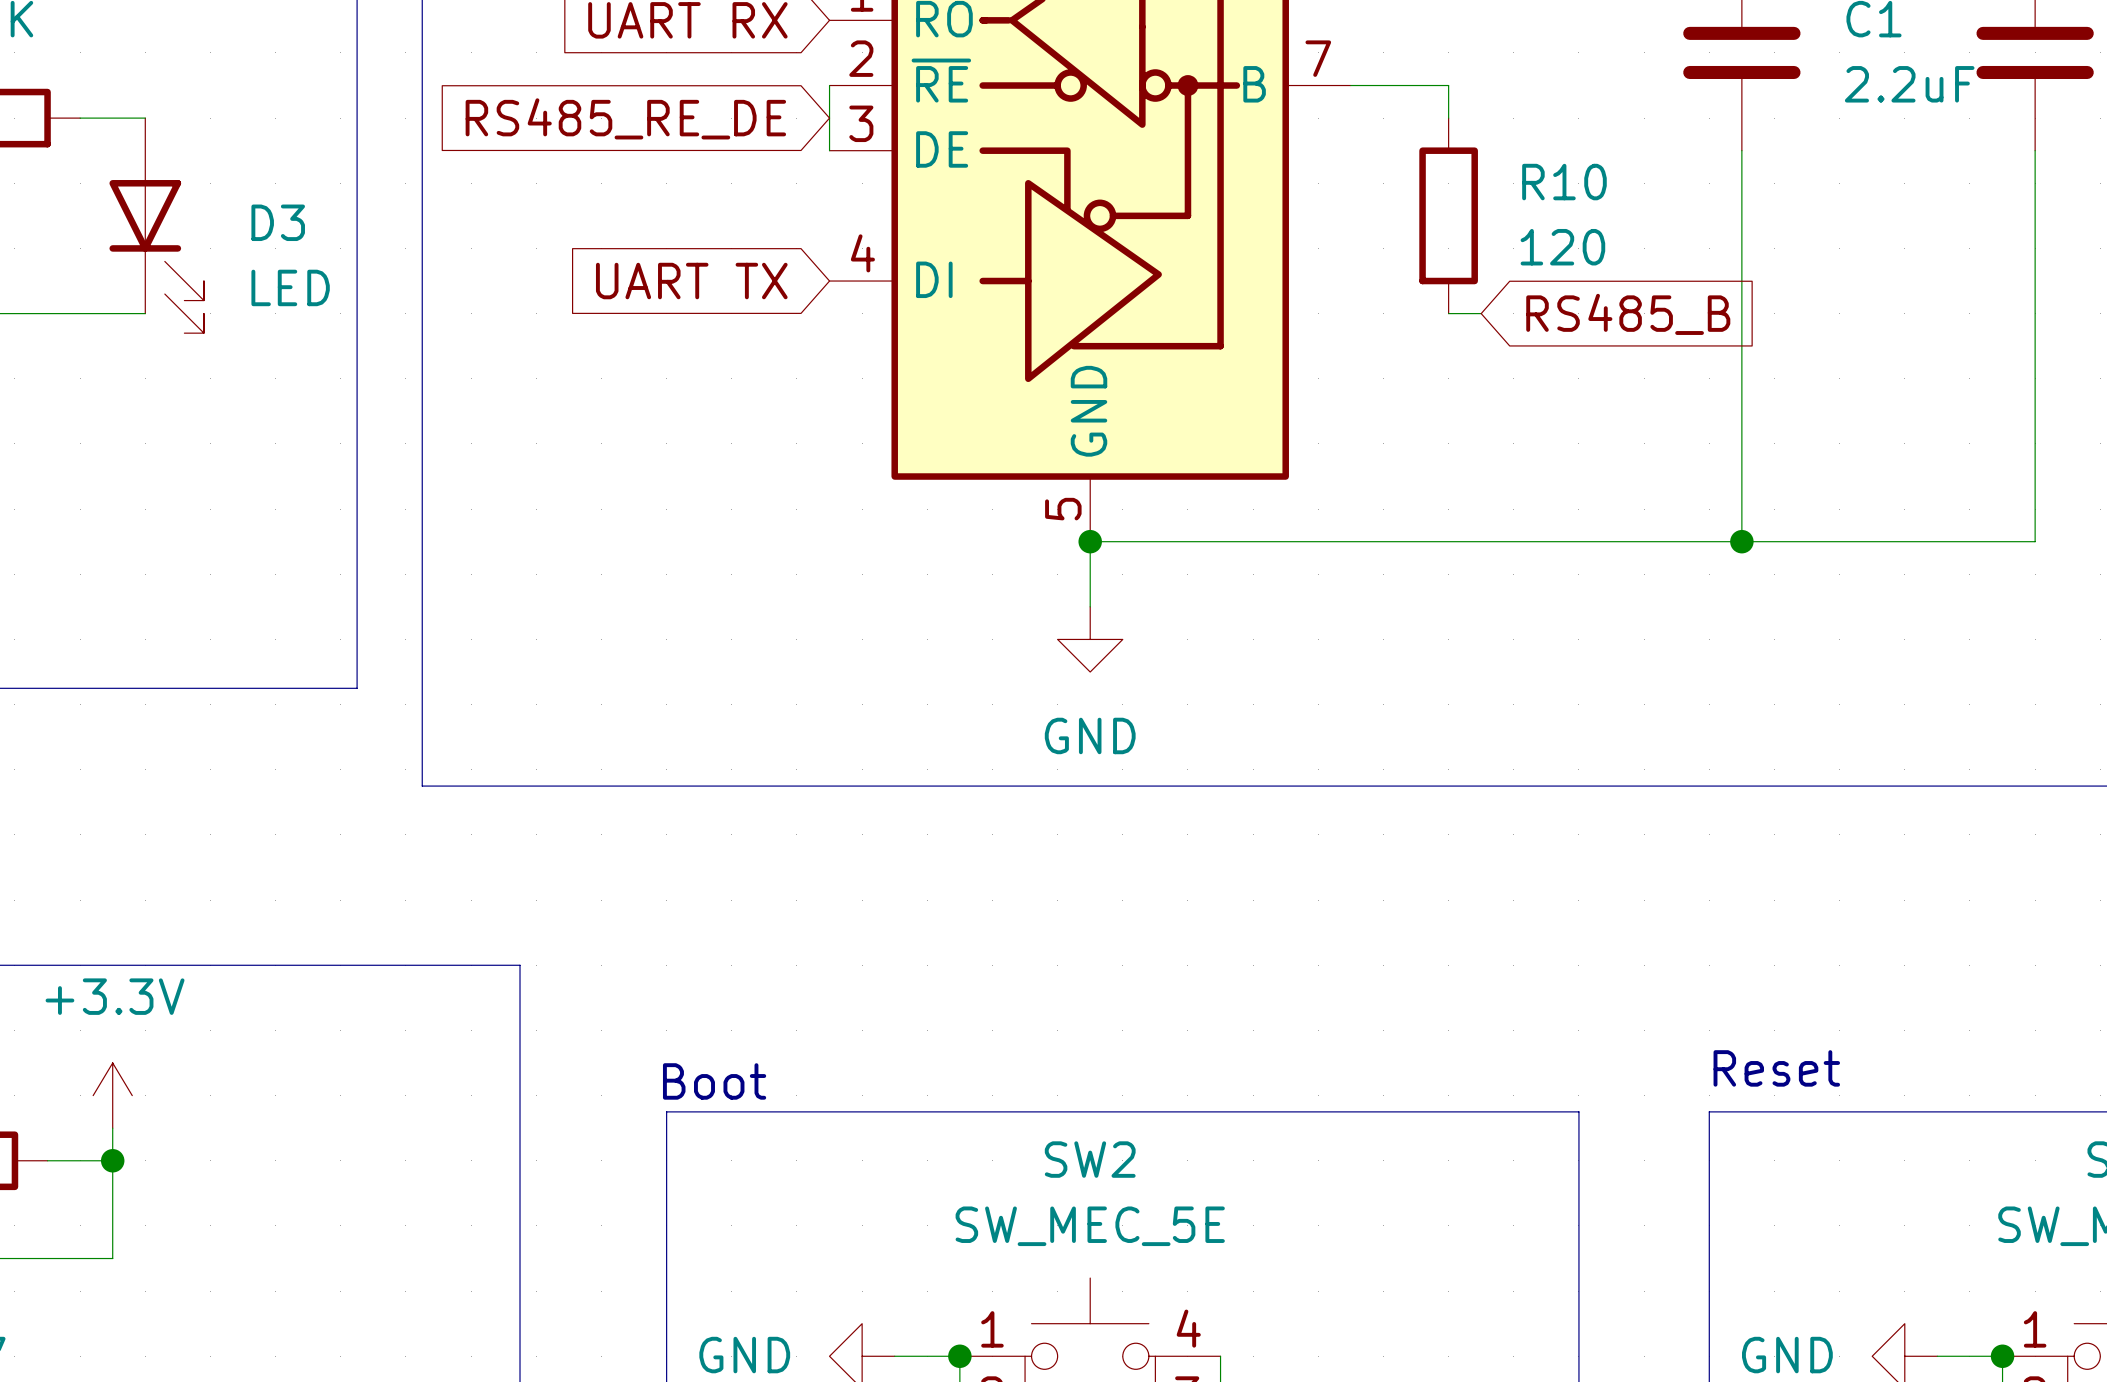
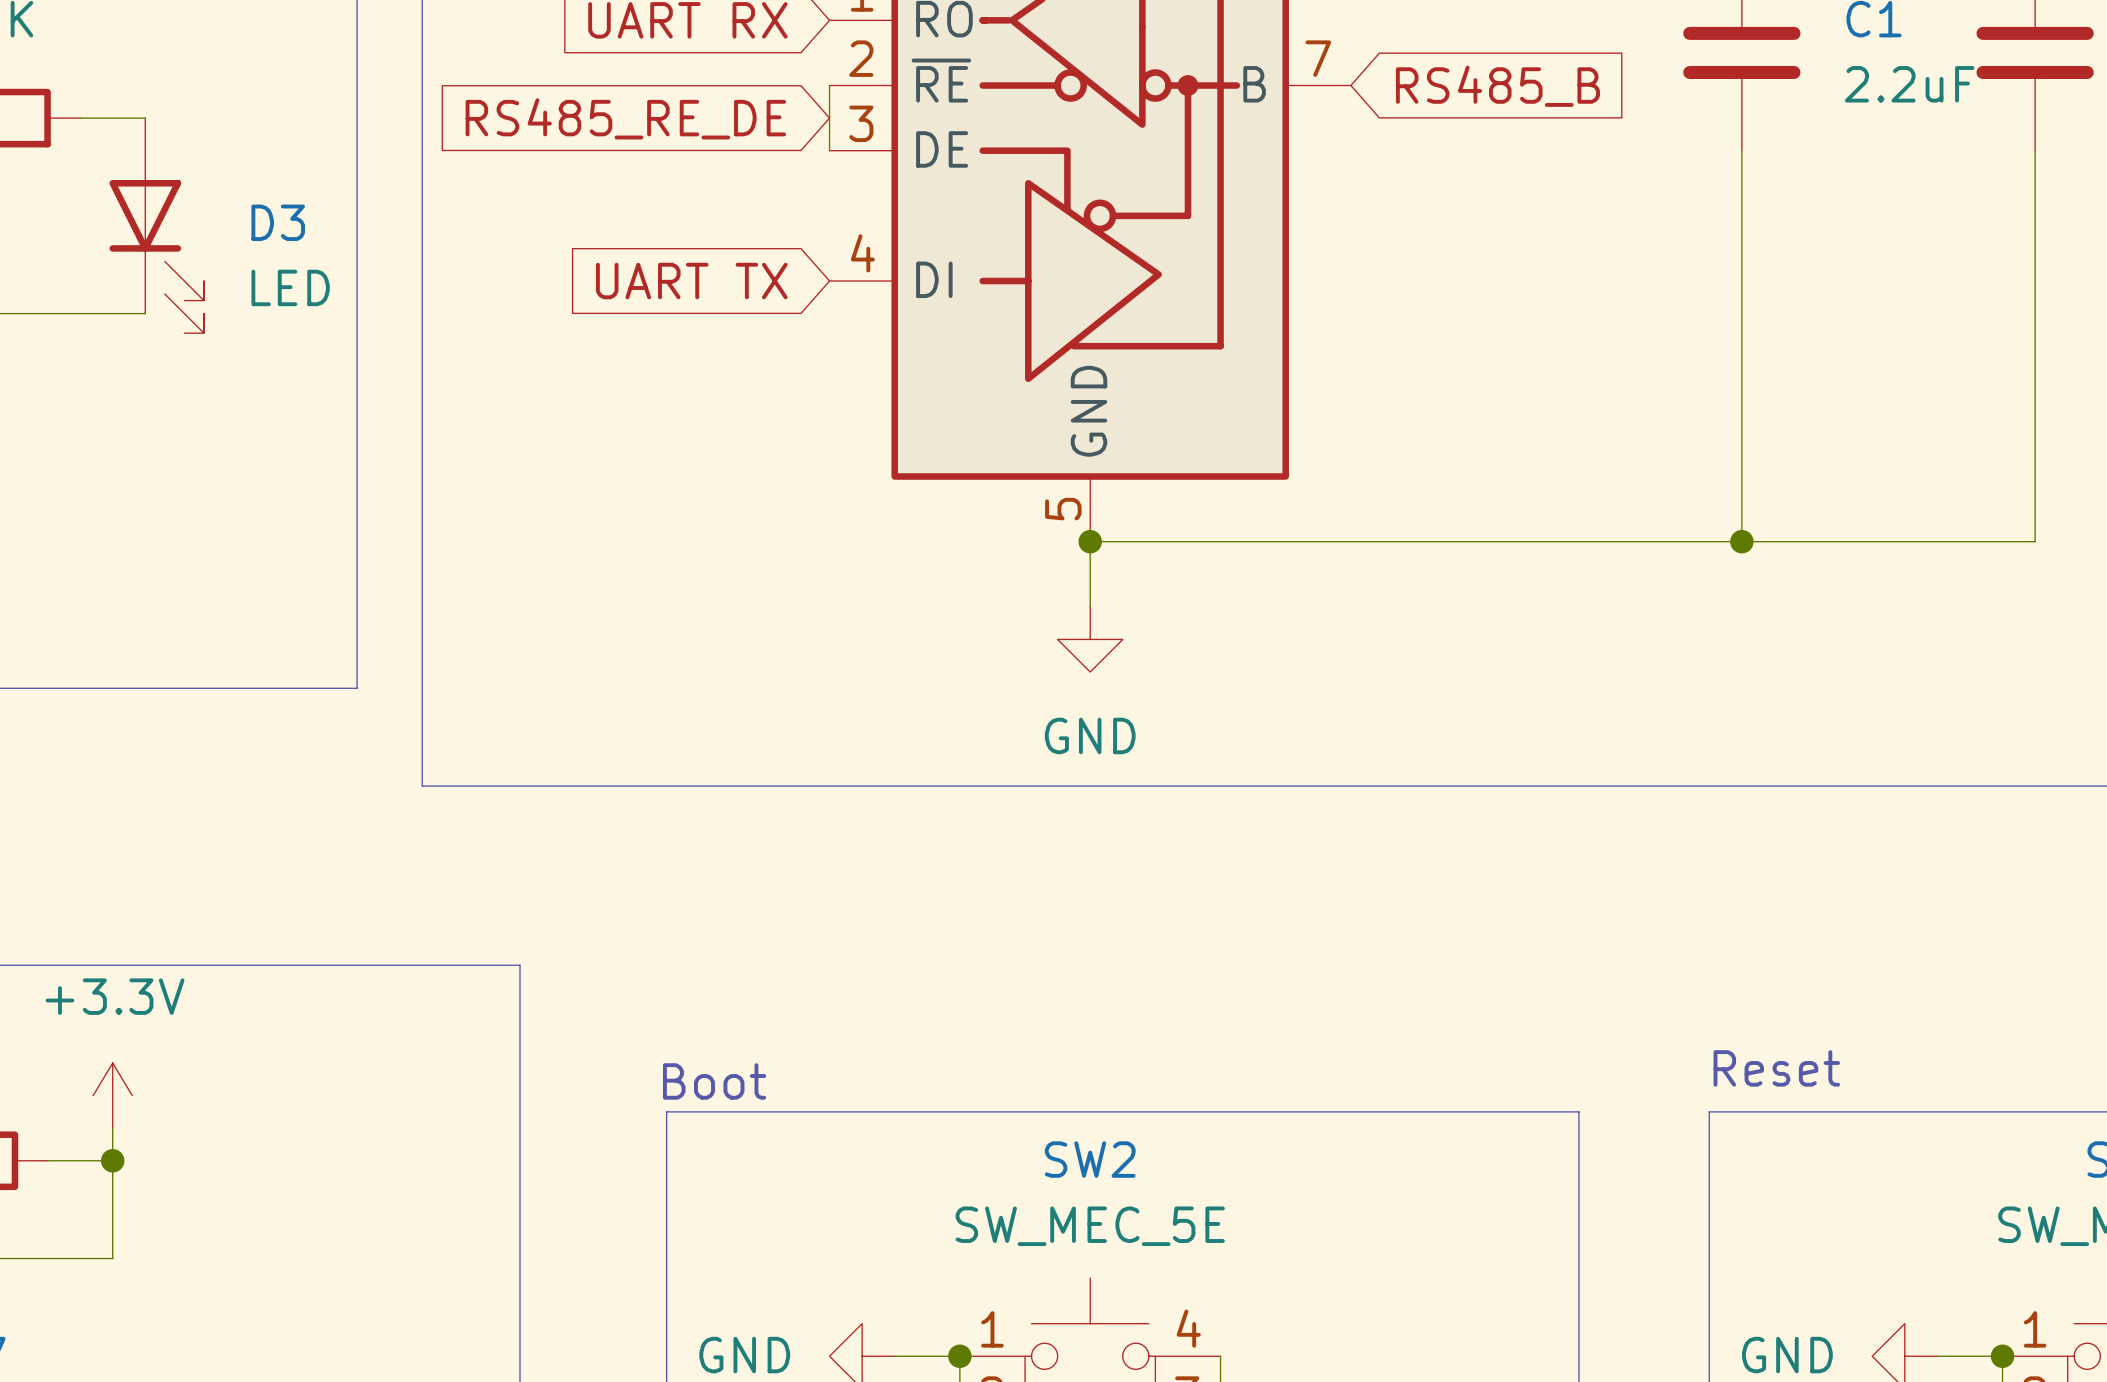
wire: (1350, 85) (1448, 85) (1448, 118) -> none
R10: 120 (1448, 215) -> none
wire: (1448, 313) (1481, 313) -> none
global label position: RS485_B (1628, 314) -> RS485_B (1497, 86)

